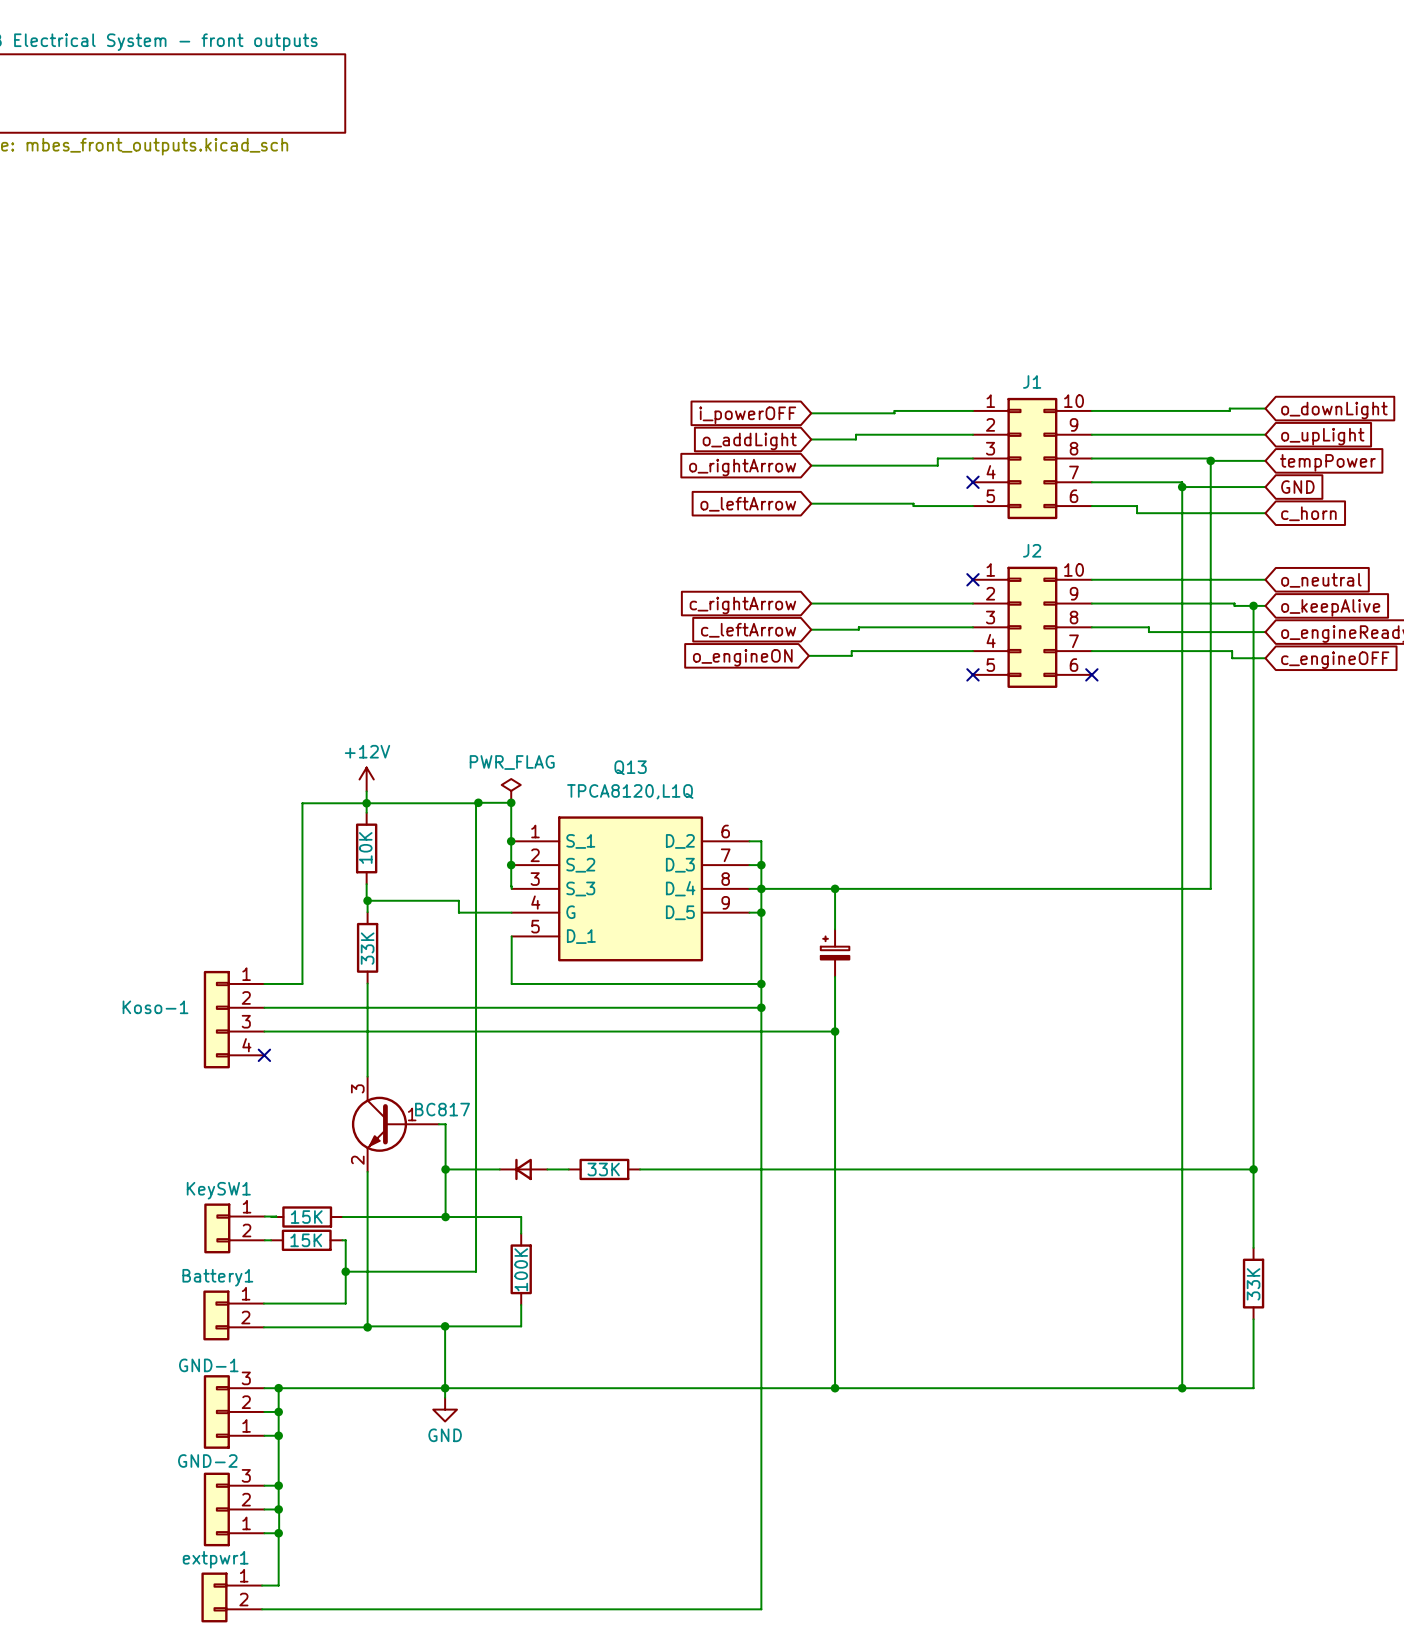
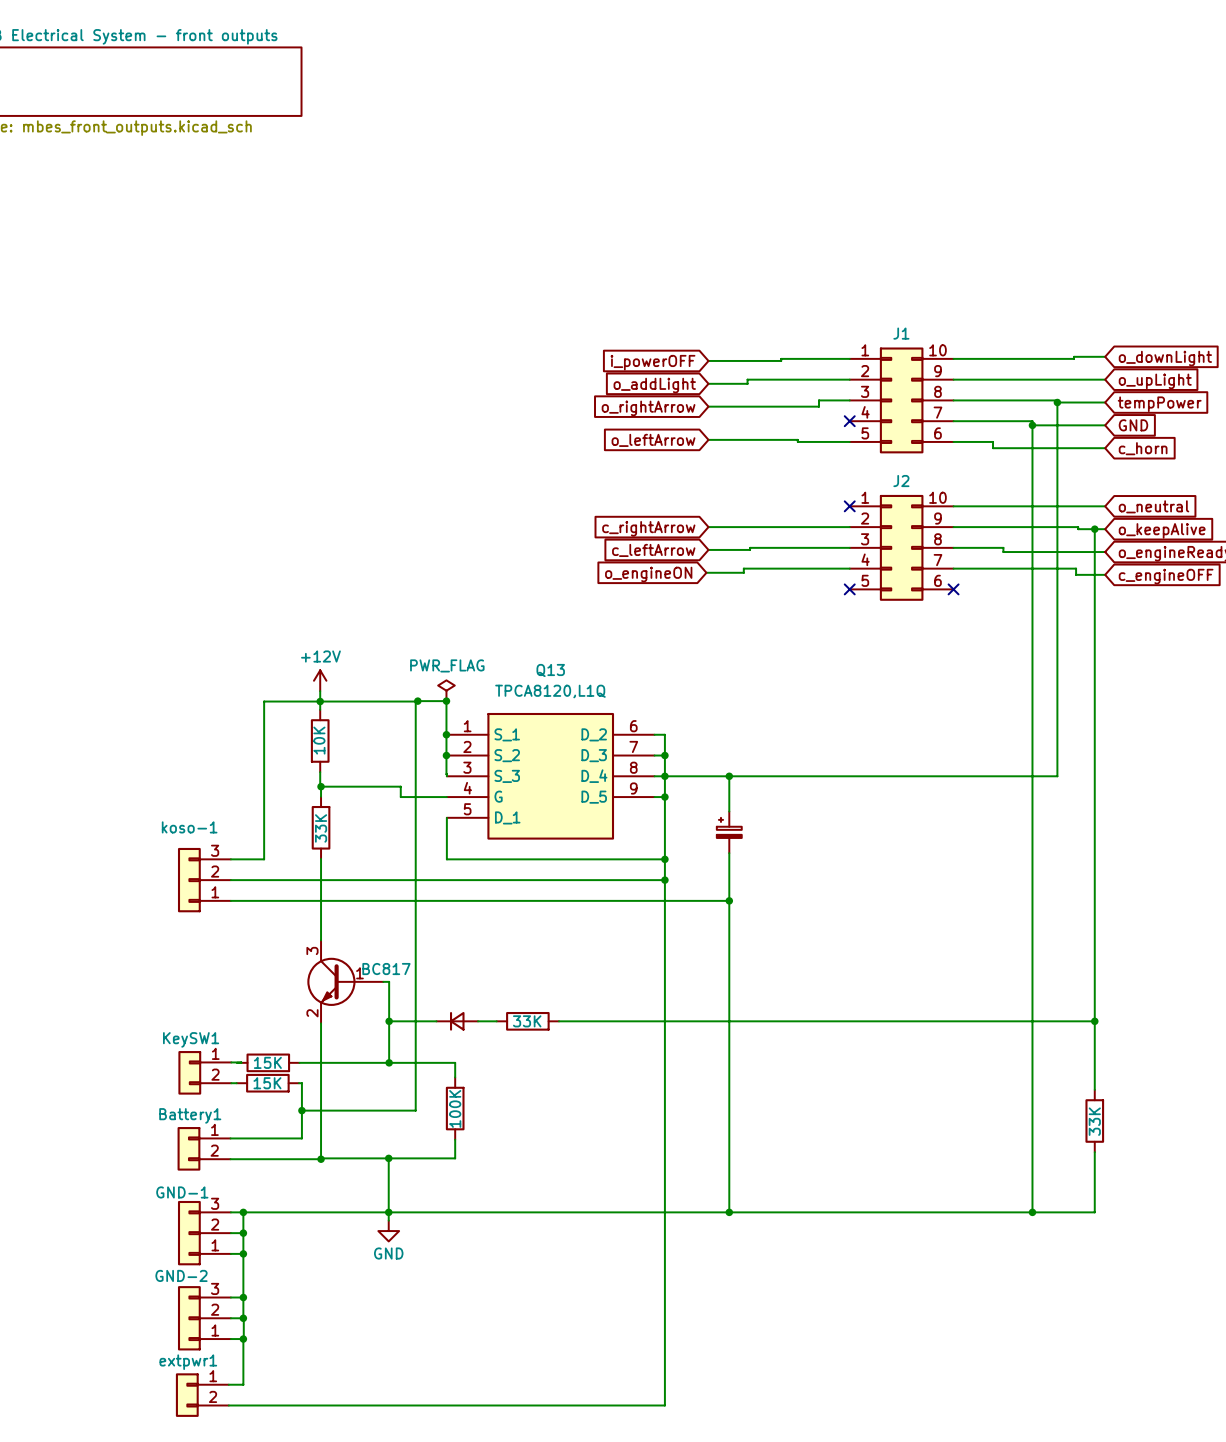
koso-1: none -> (204, 880)
Koso-1: (234, 1019) -> none
no-connect mark: (264, 1055) -> none

